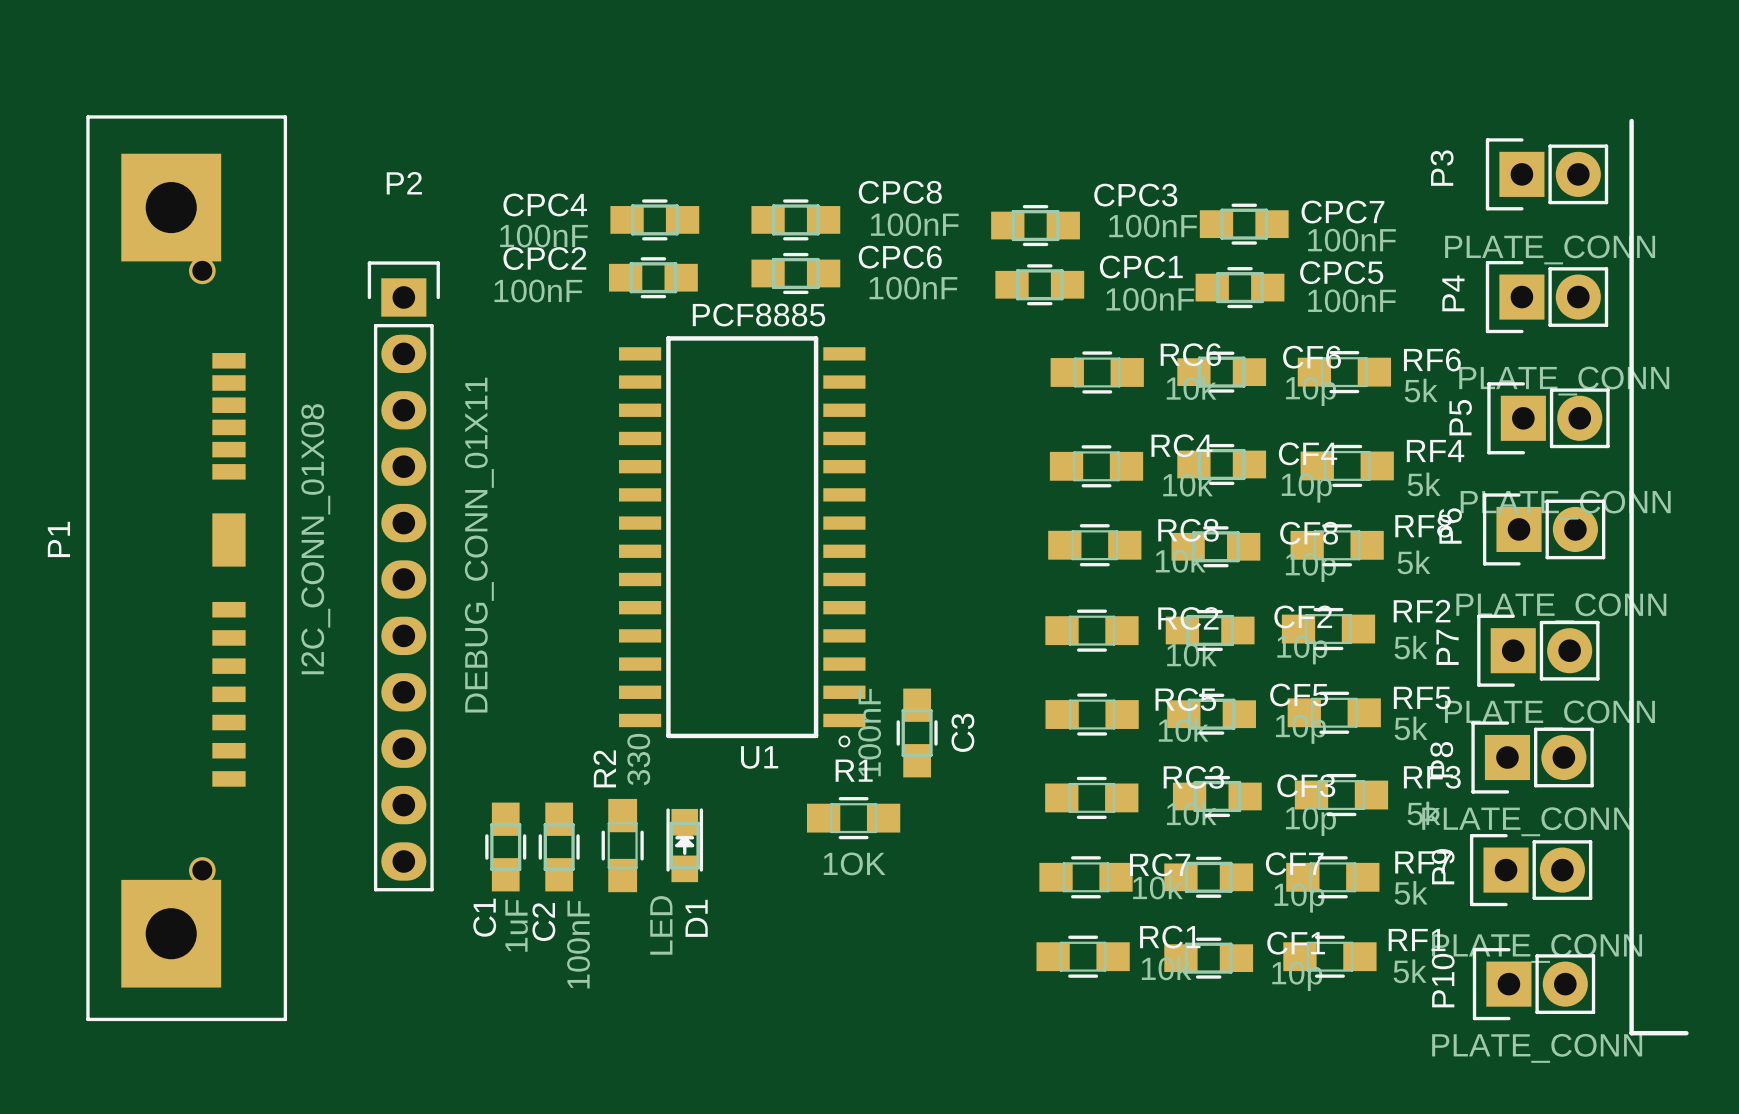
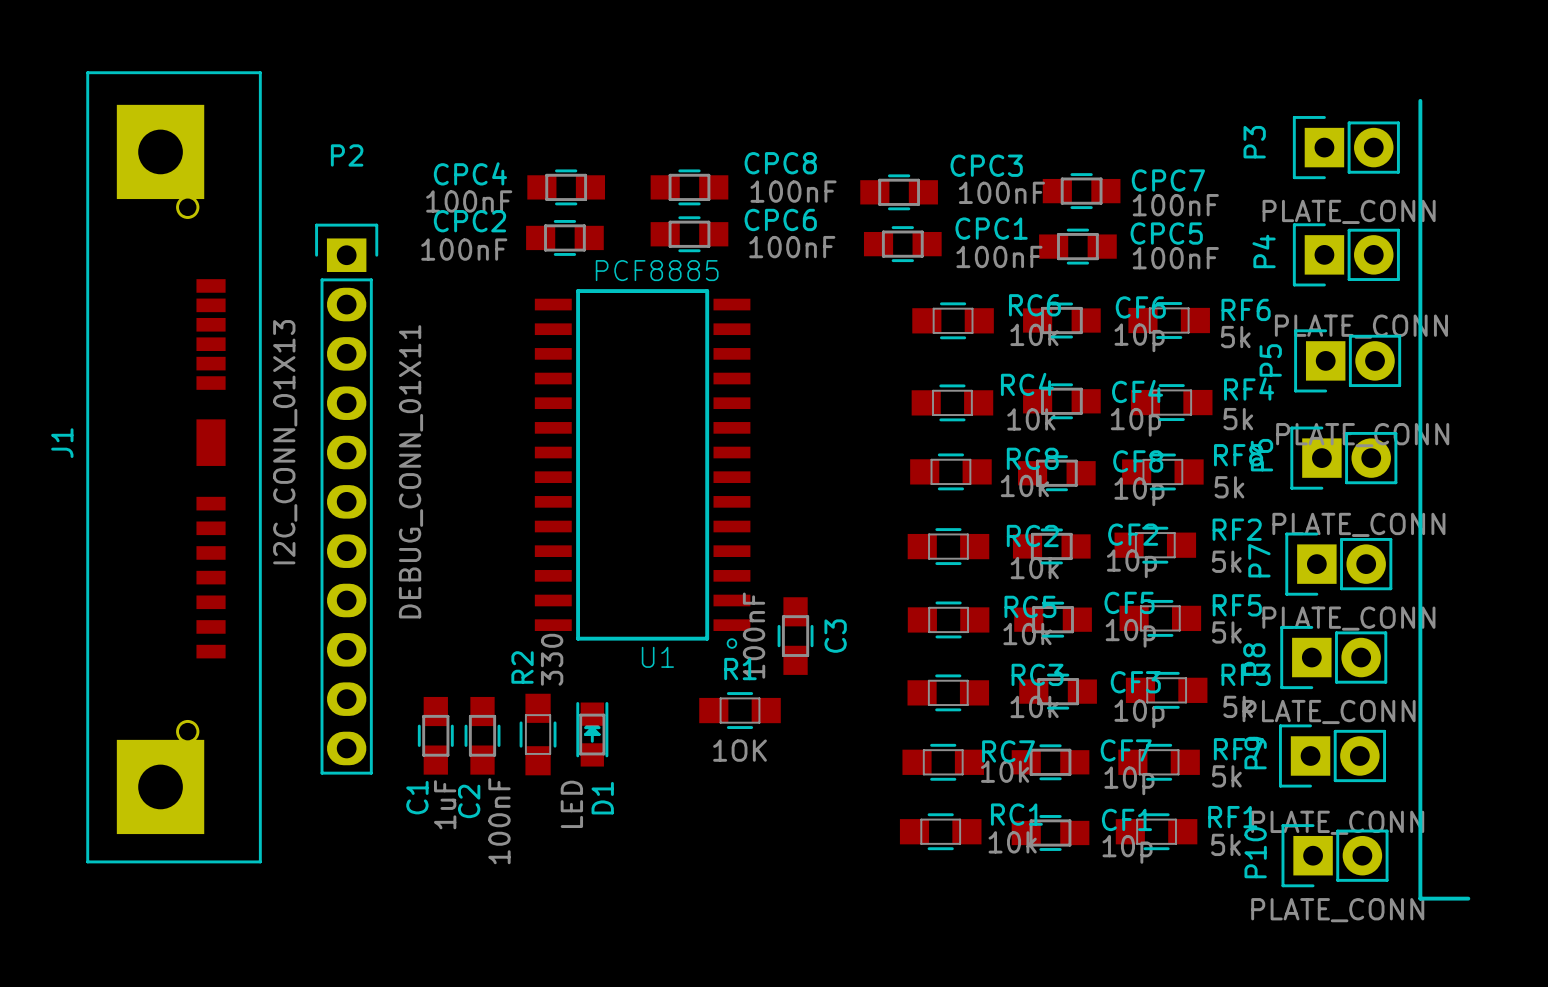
J1: none -> I2C_CONN_01X13 (174, 467)
P1: I2C_CONN_01X08 (186, 568) -> none

